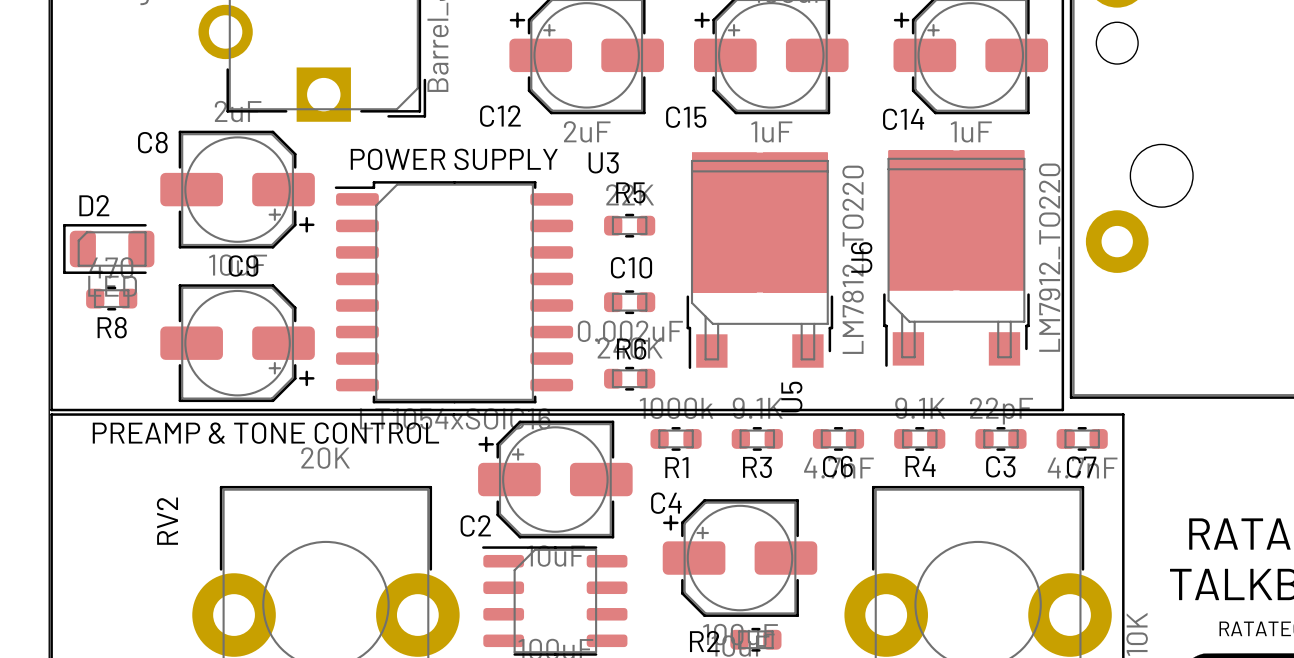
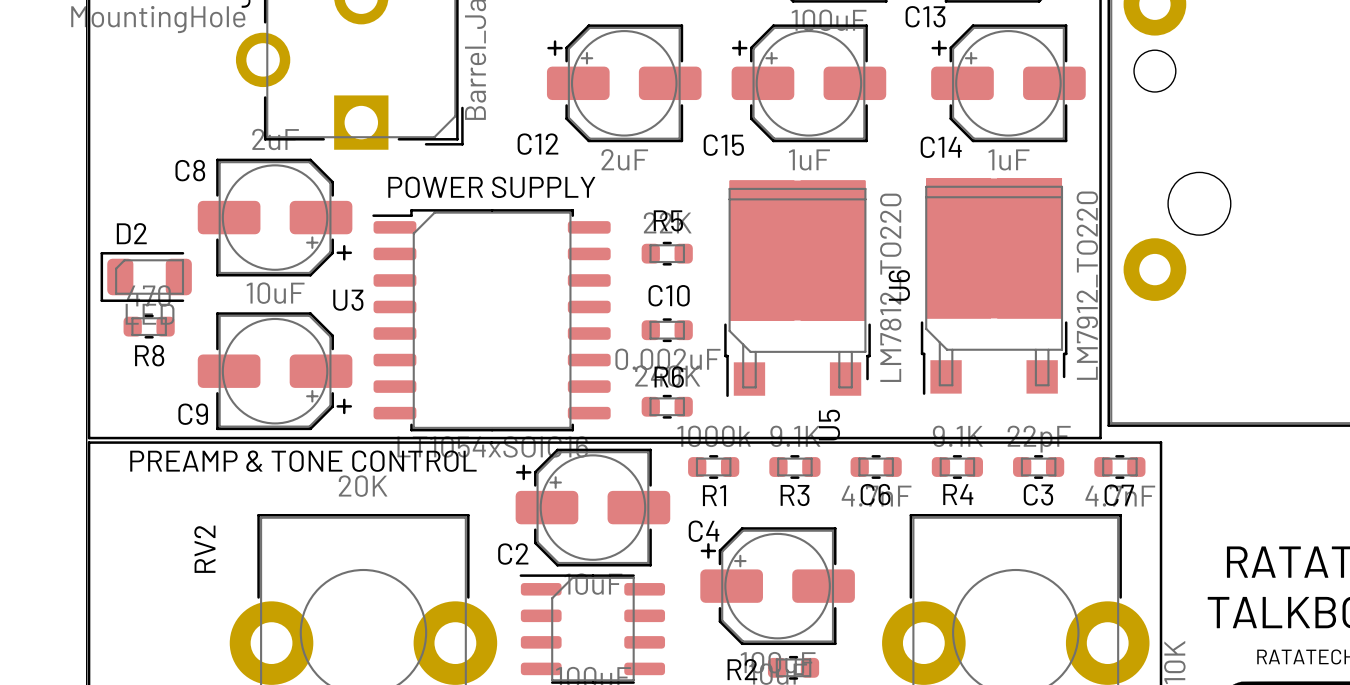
U3 name position: U3 (603, 162) -> U3 (348, 300)
C9 name position: C9 (243, 266) -> C9 (193, 414)

